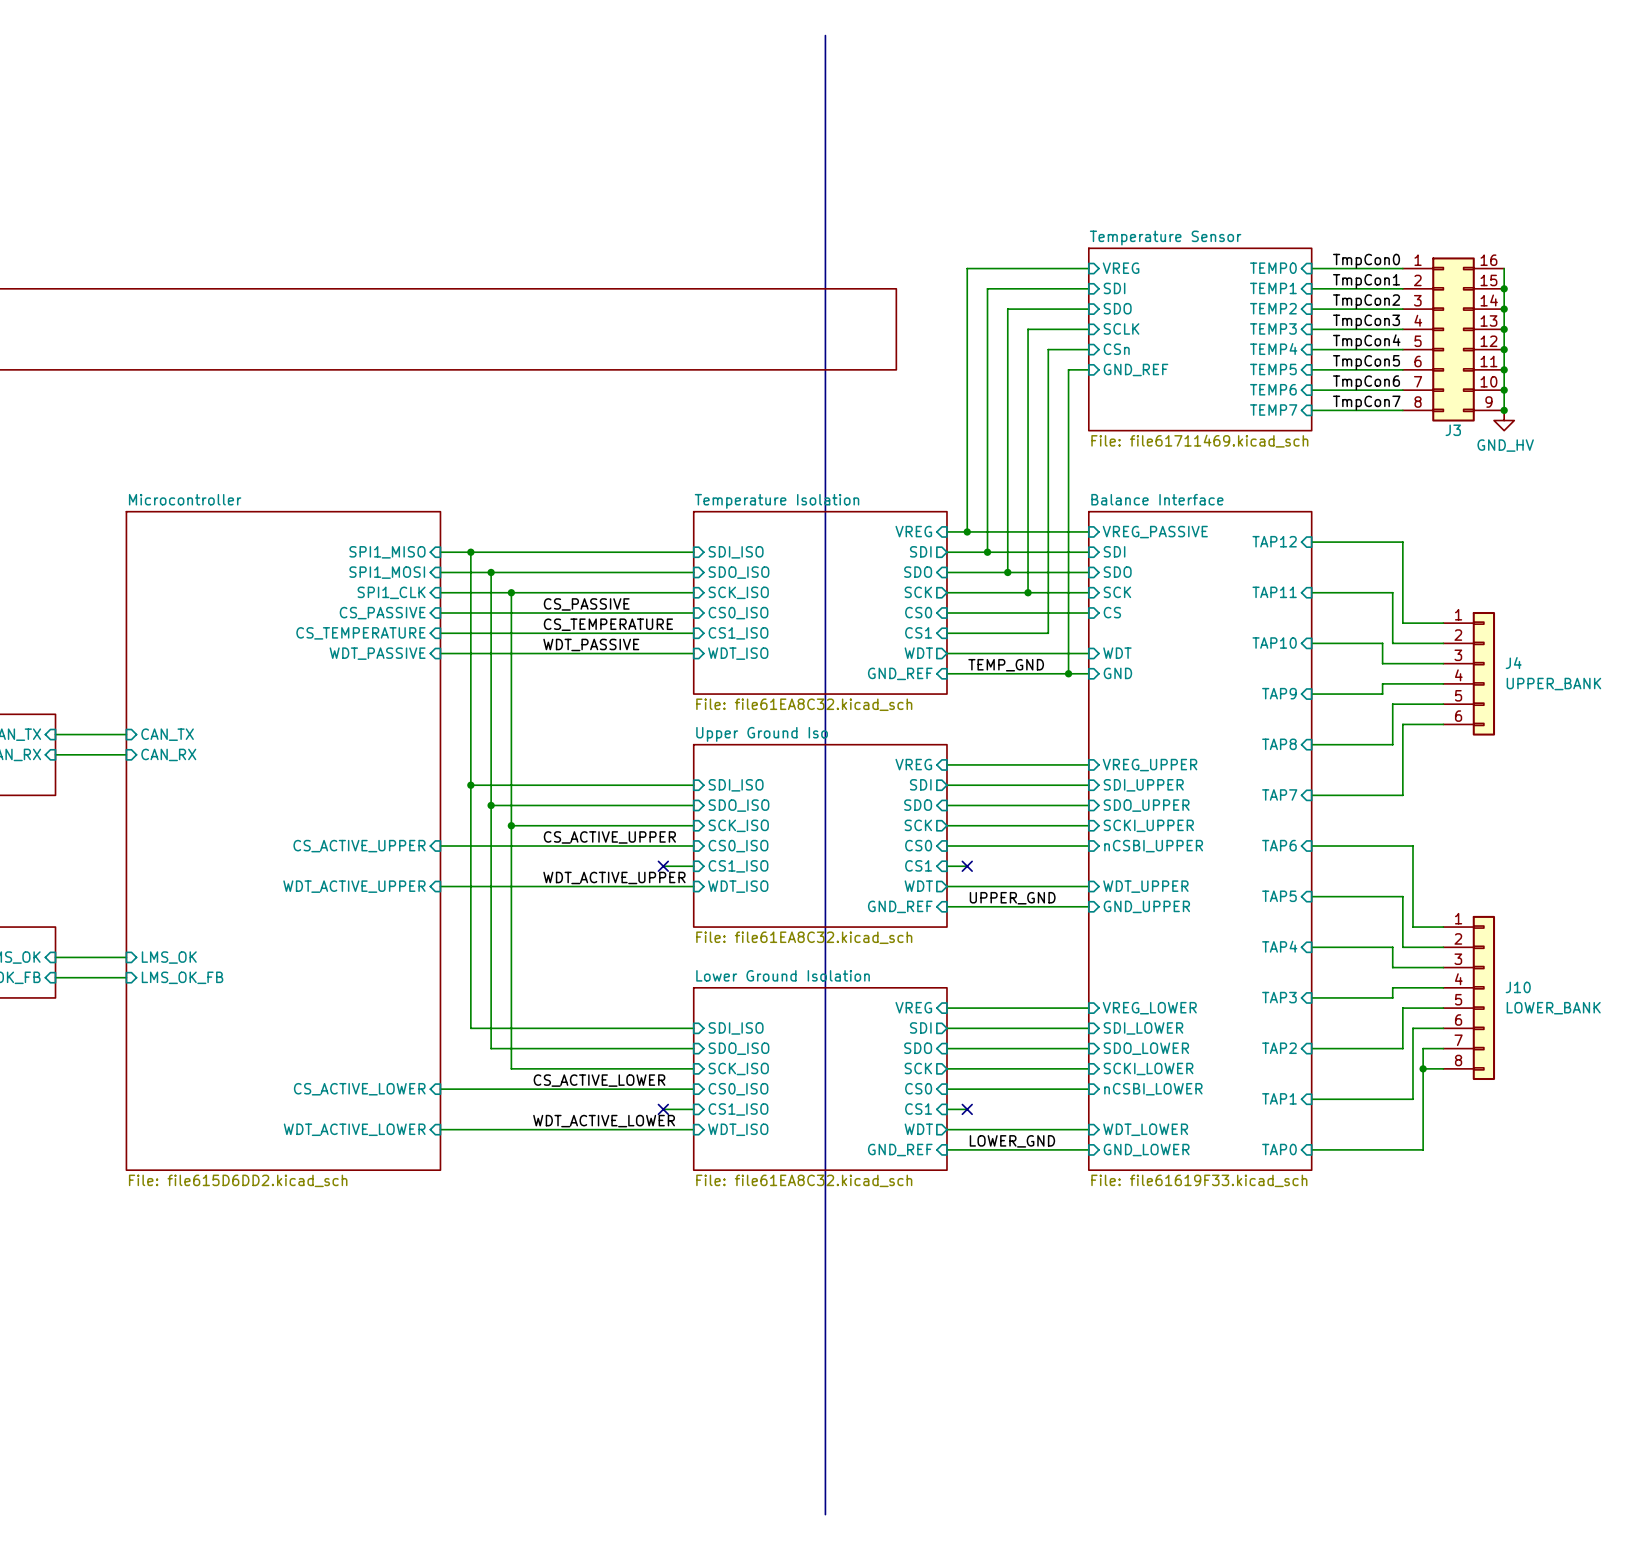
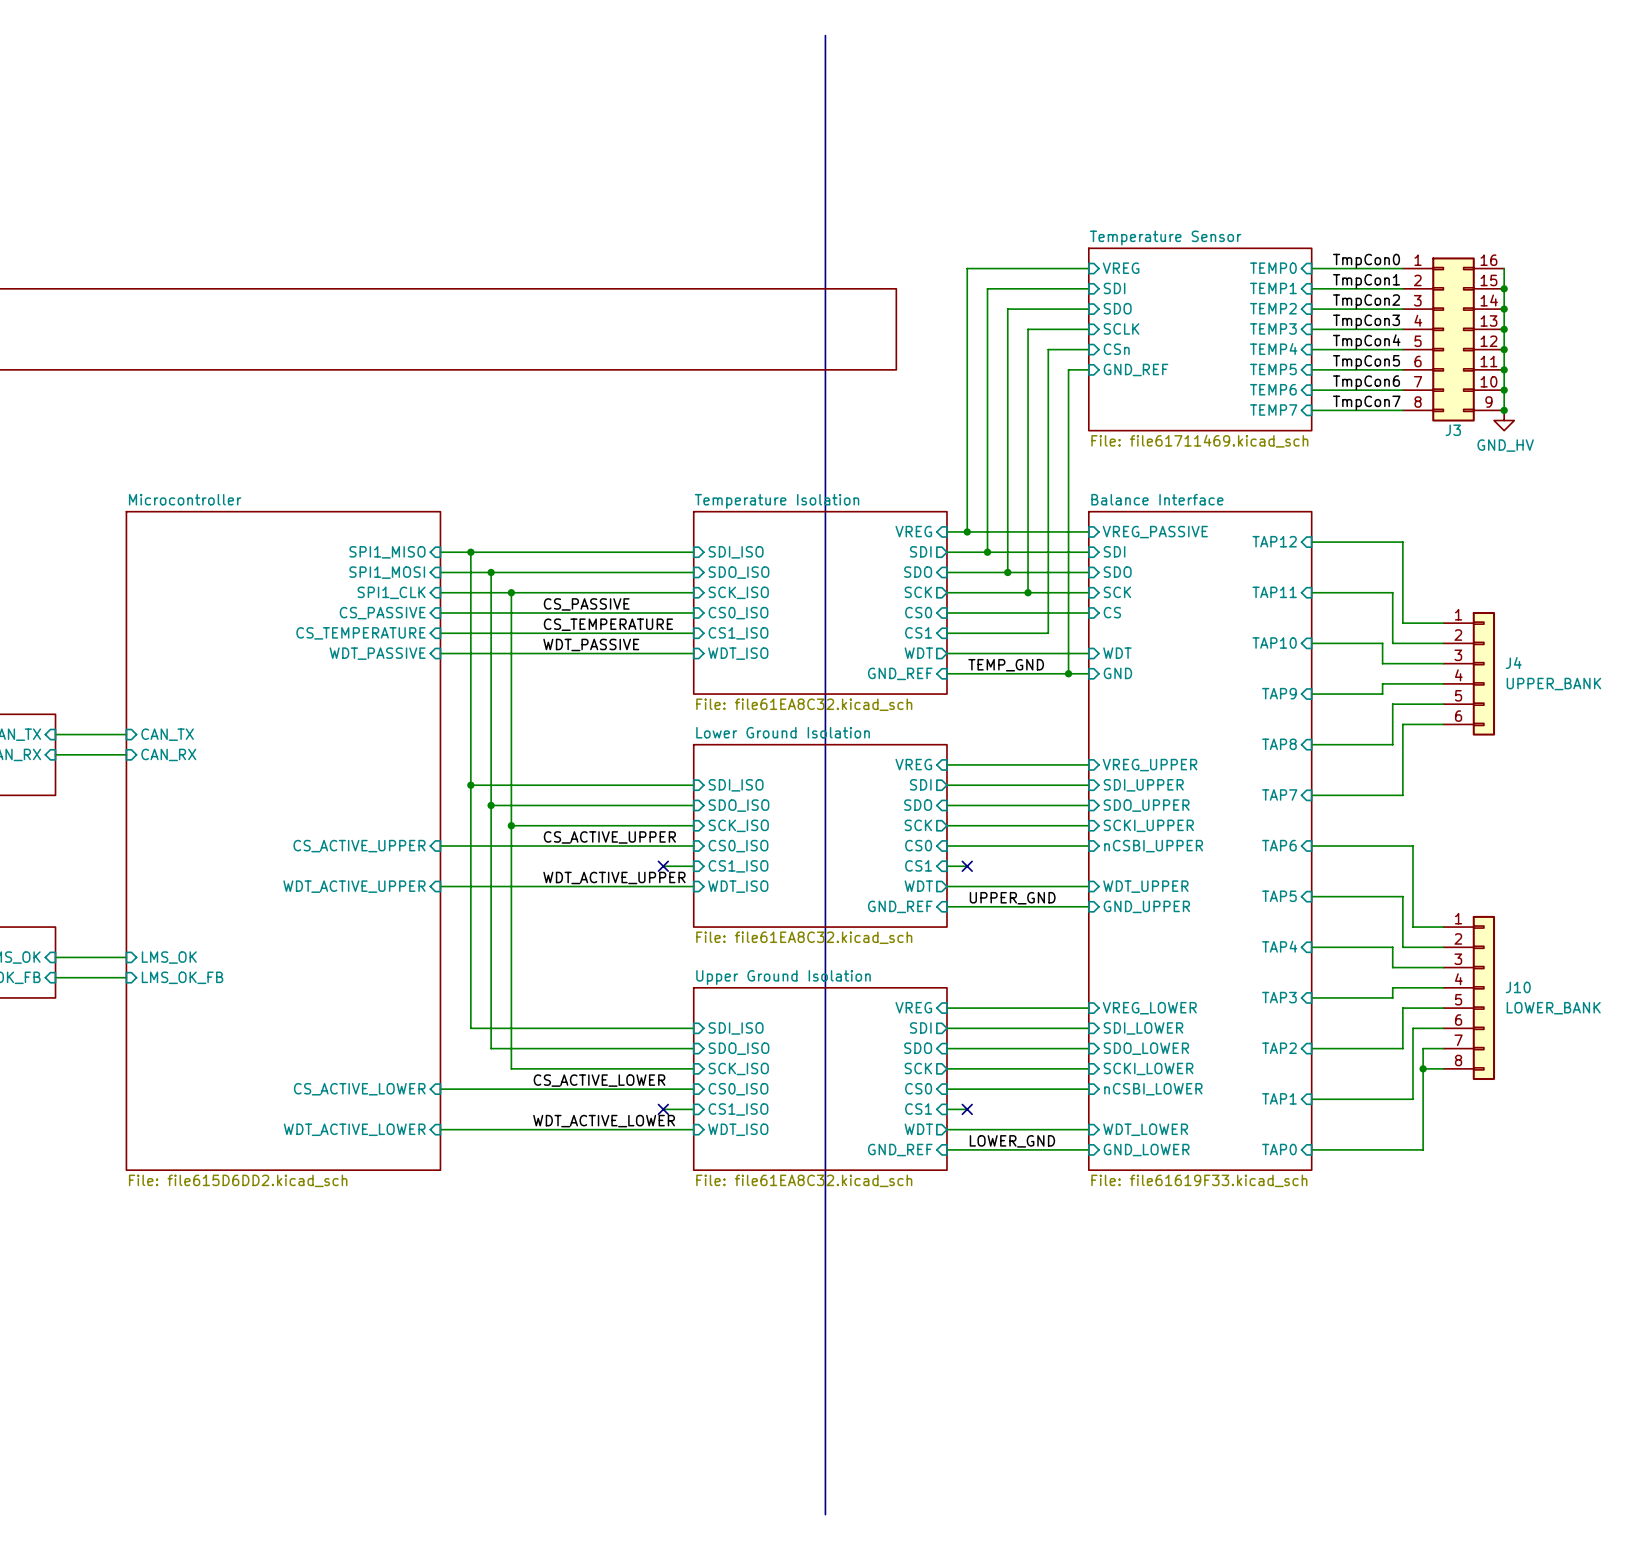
sheet Upper Ground Iso name: Upper Ground Iso (762, 734) -> Lower Ground Isolation (783, 732)
sheet Lower Ground Isolation name: Lower Ground Isolation (783, 975) -> Upper Ground Isolation (783, 977)

